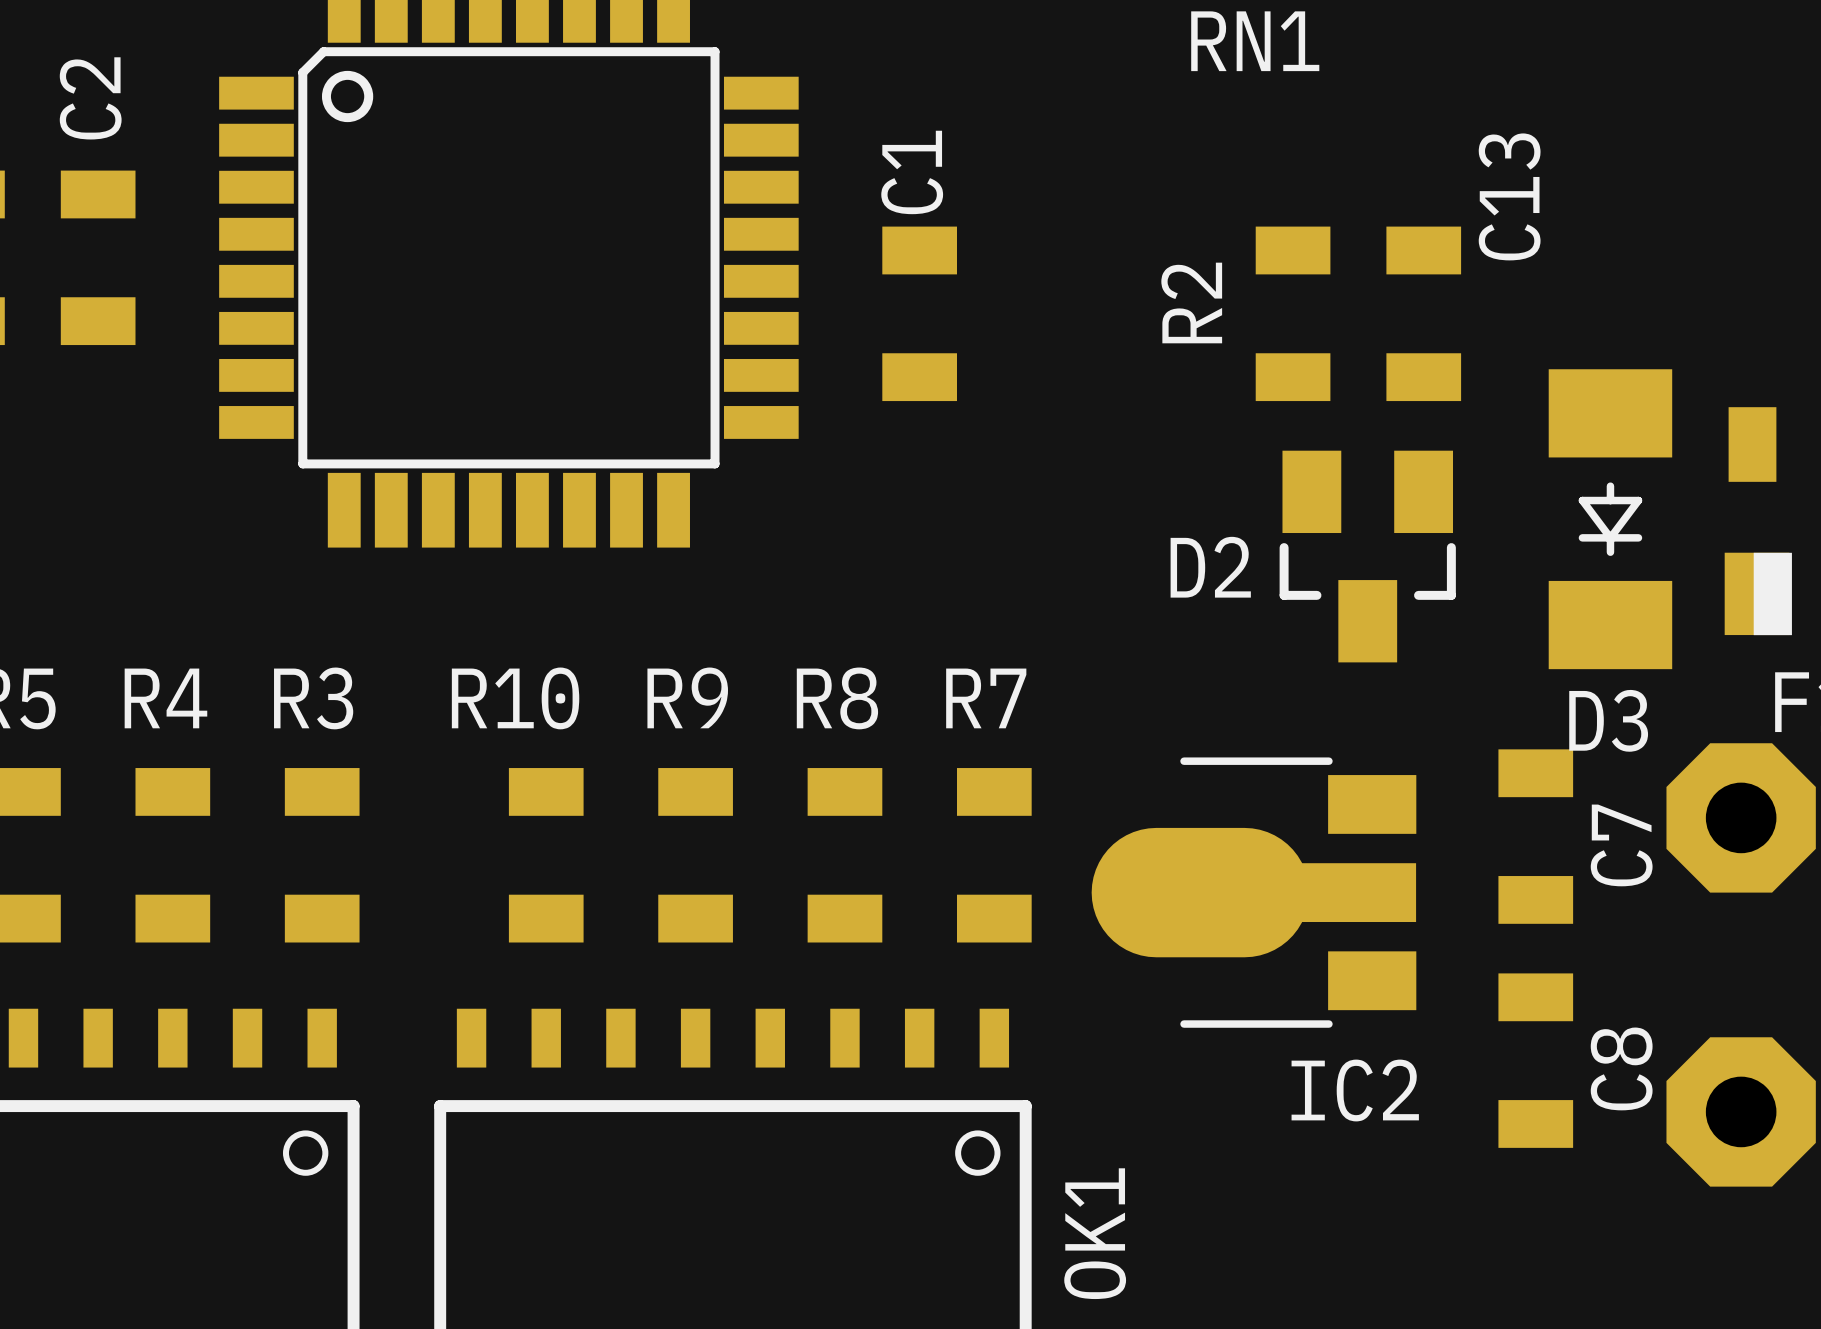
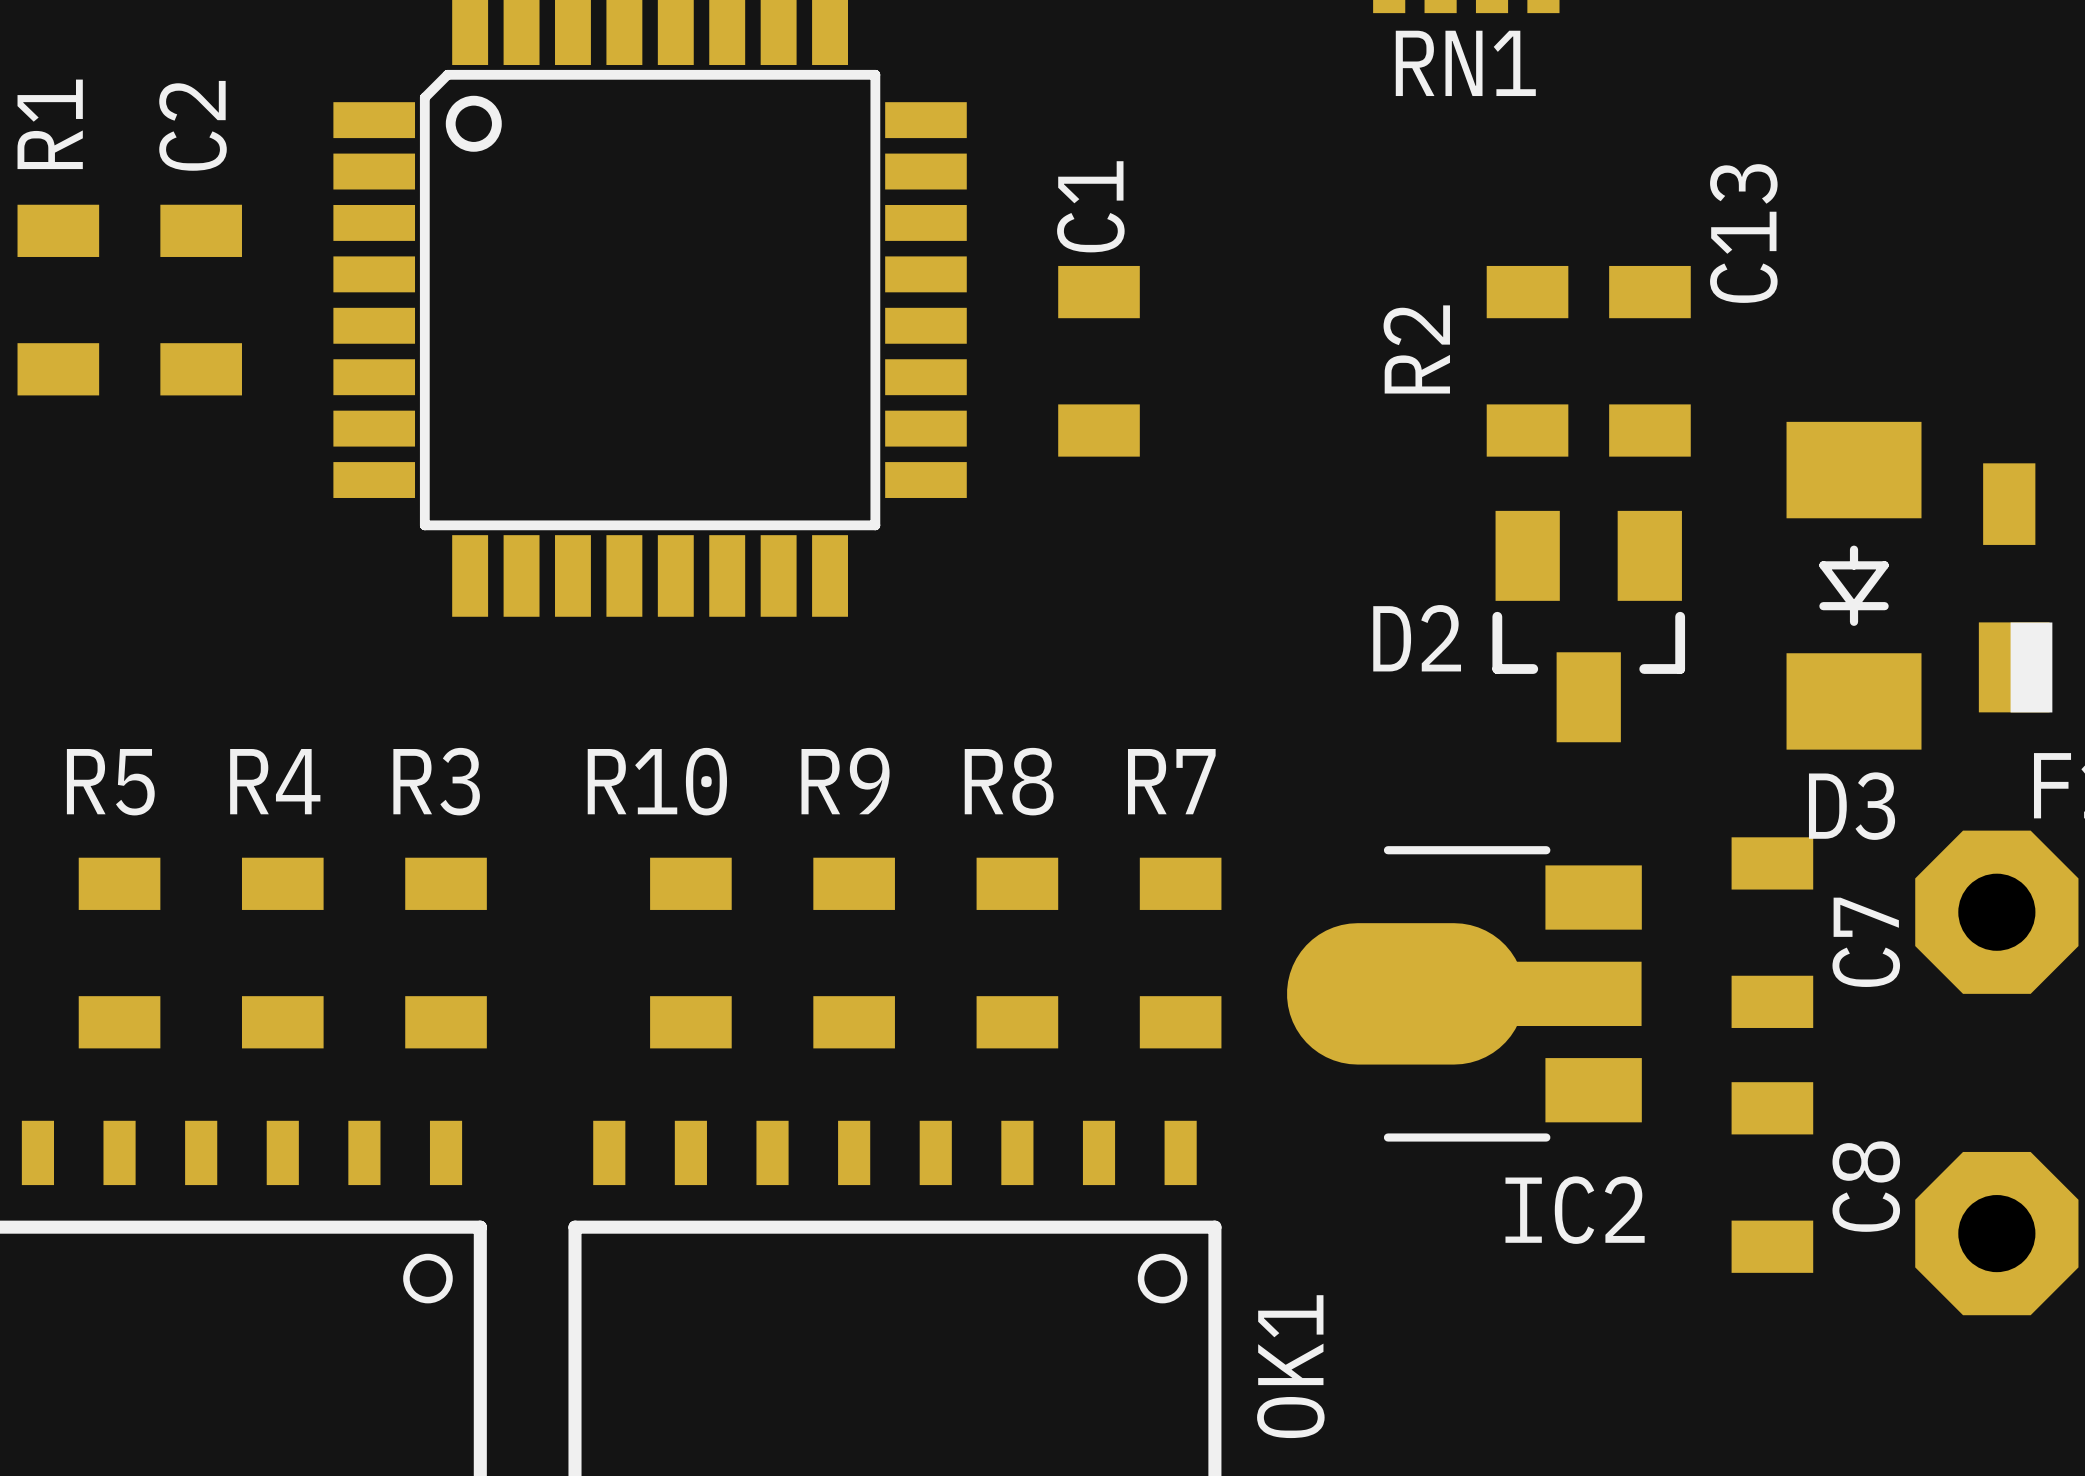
R2 position: (1293, 313) -> (1527, 361)

